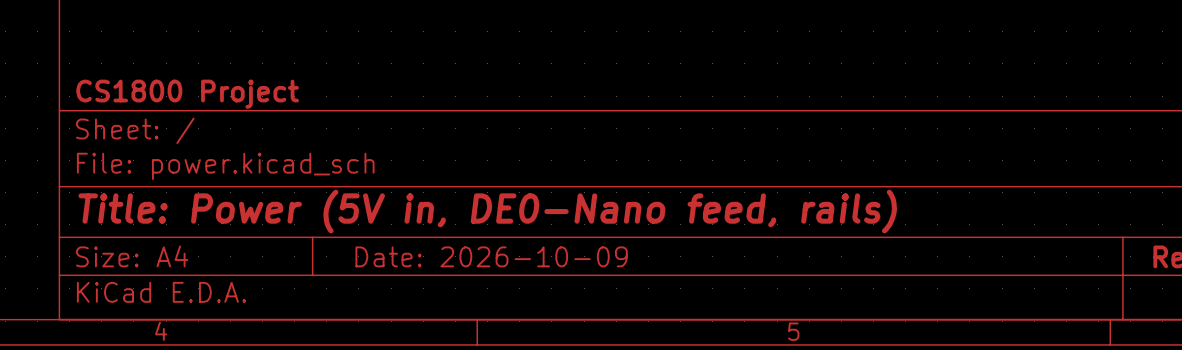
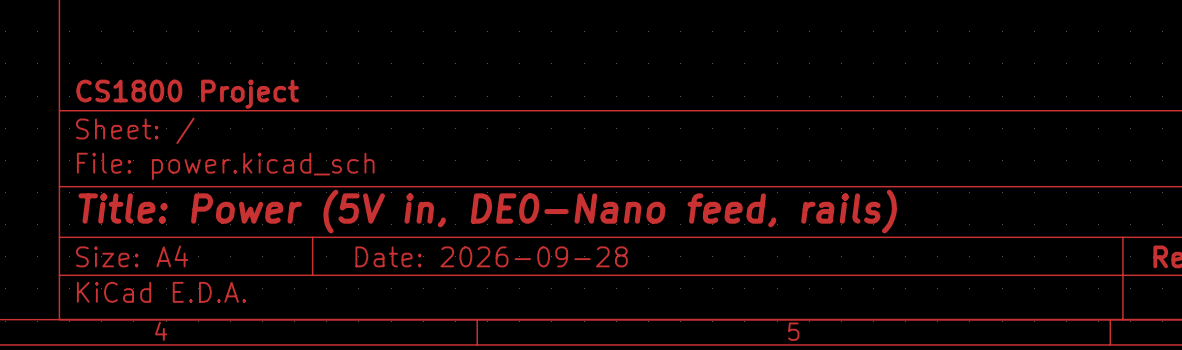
title block: Date: 2026-10-09 (491, 256) -> Date: 2026-09-28 (491, 256)

